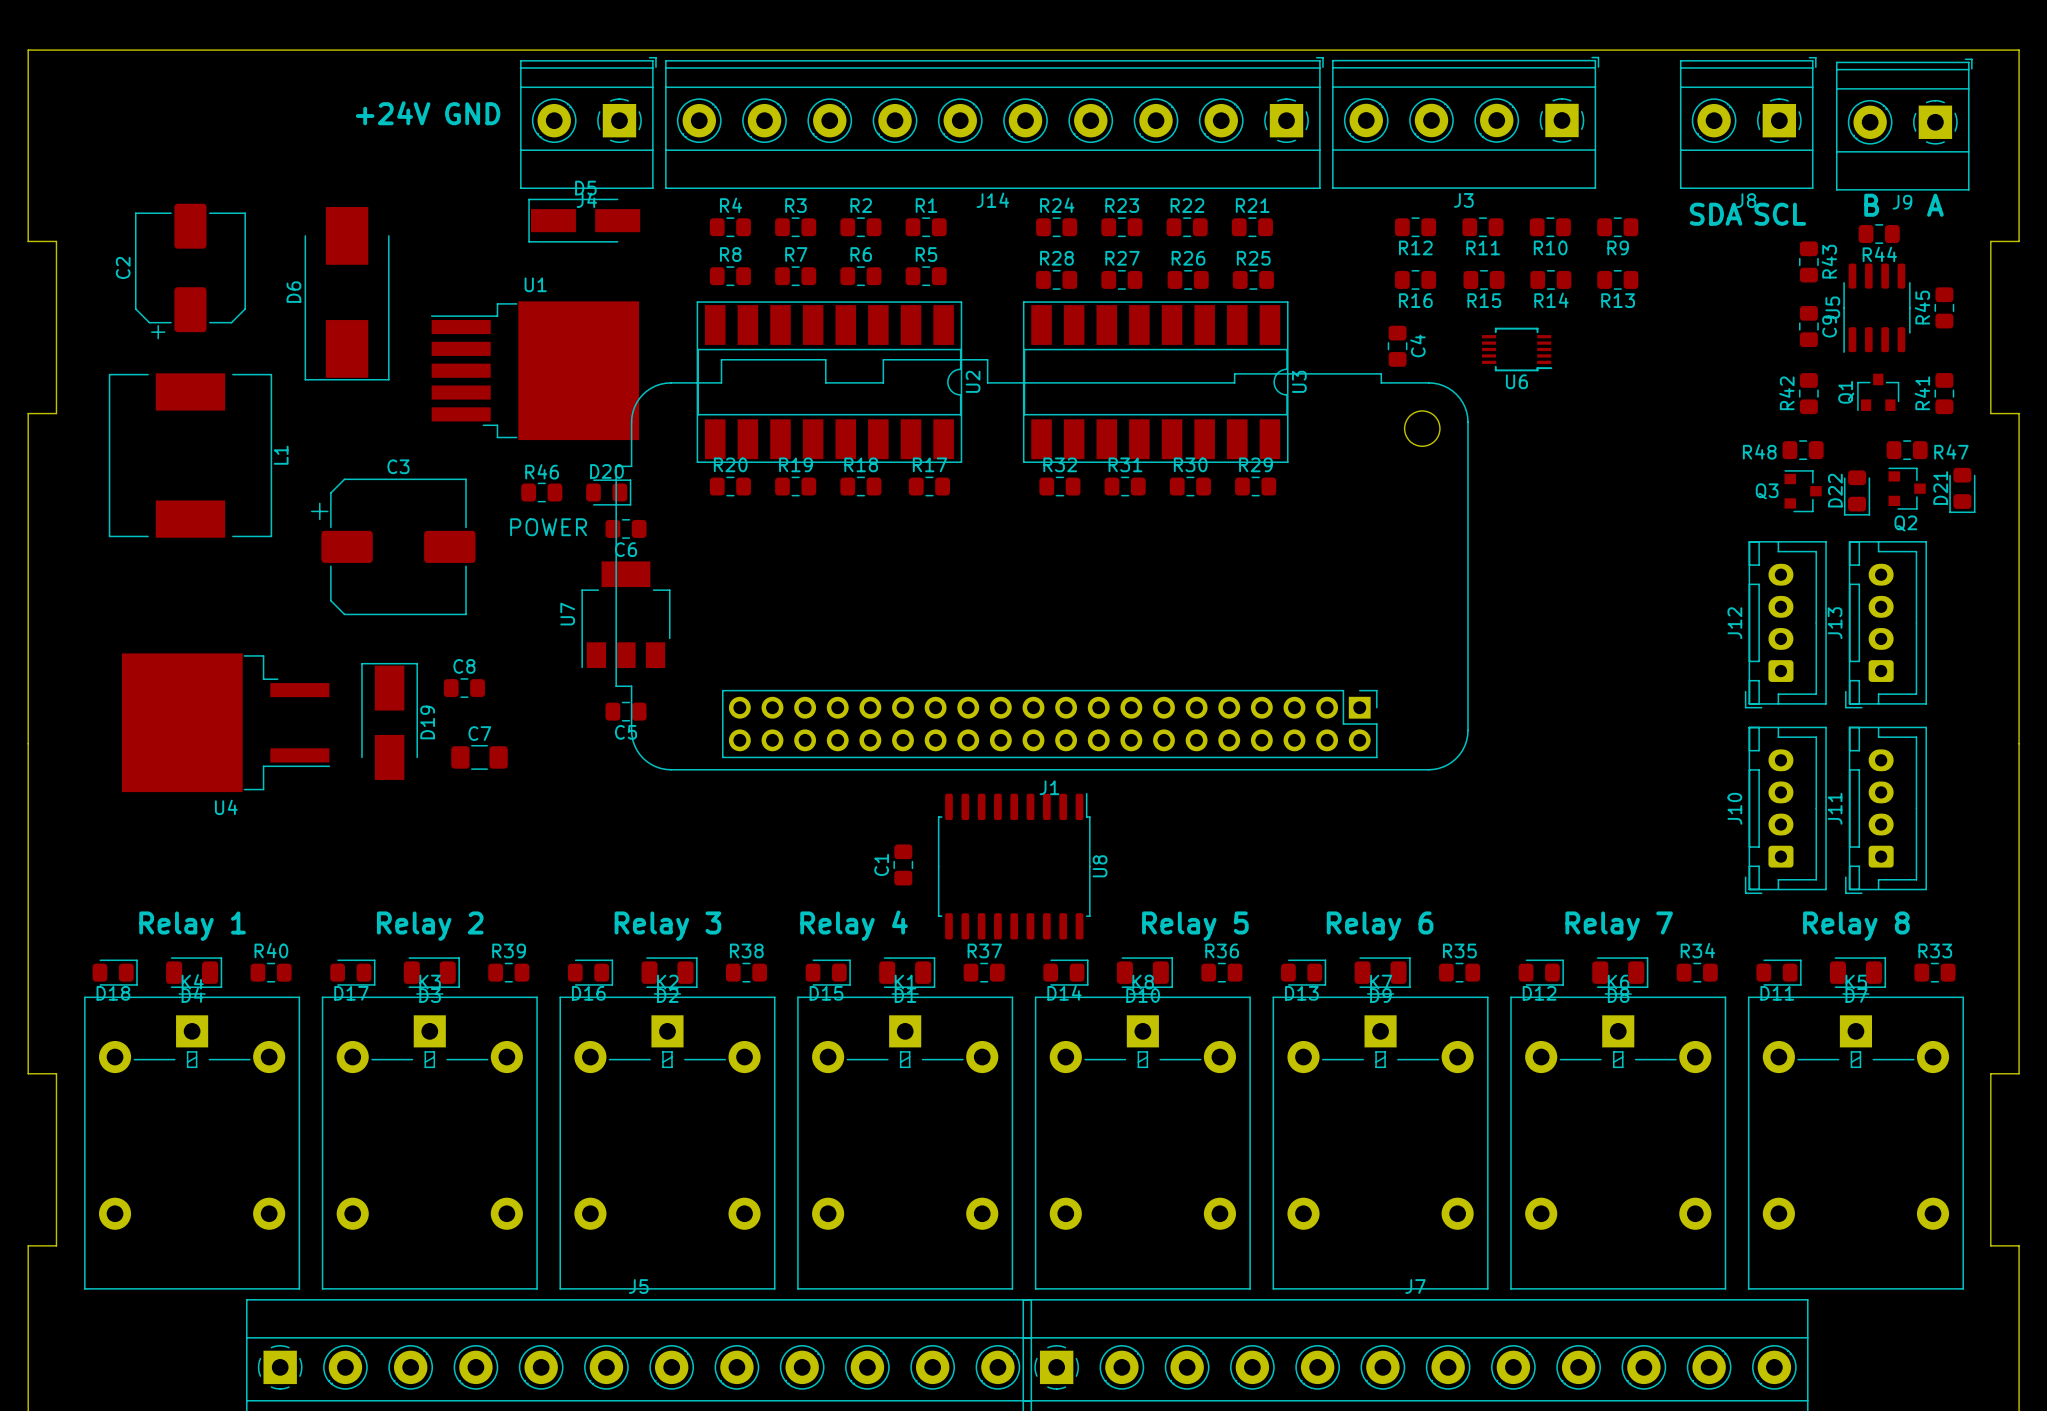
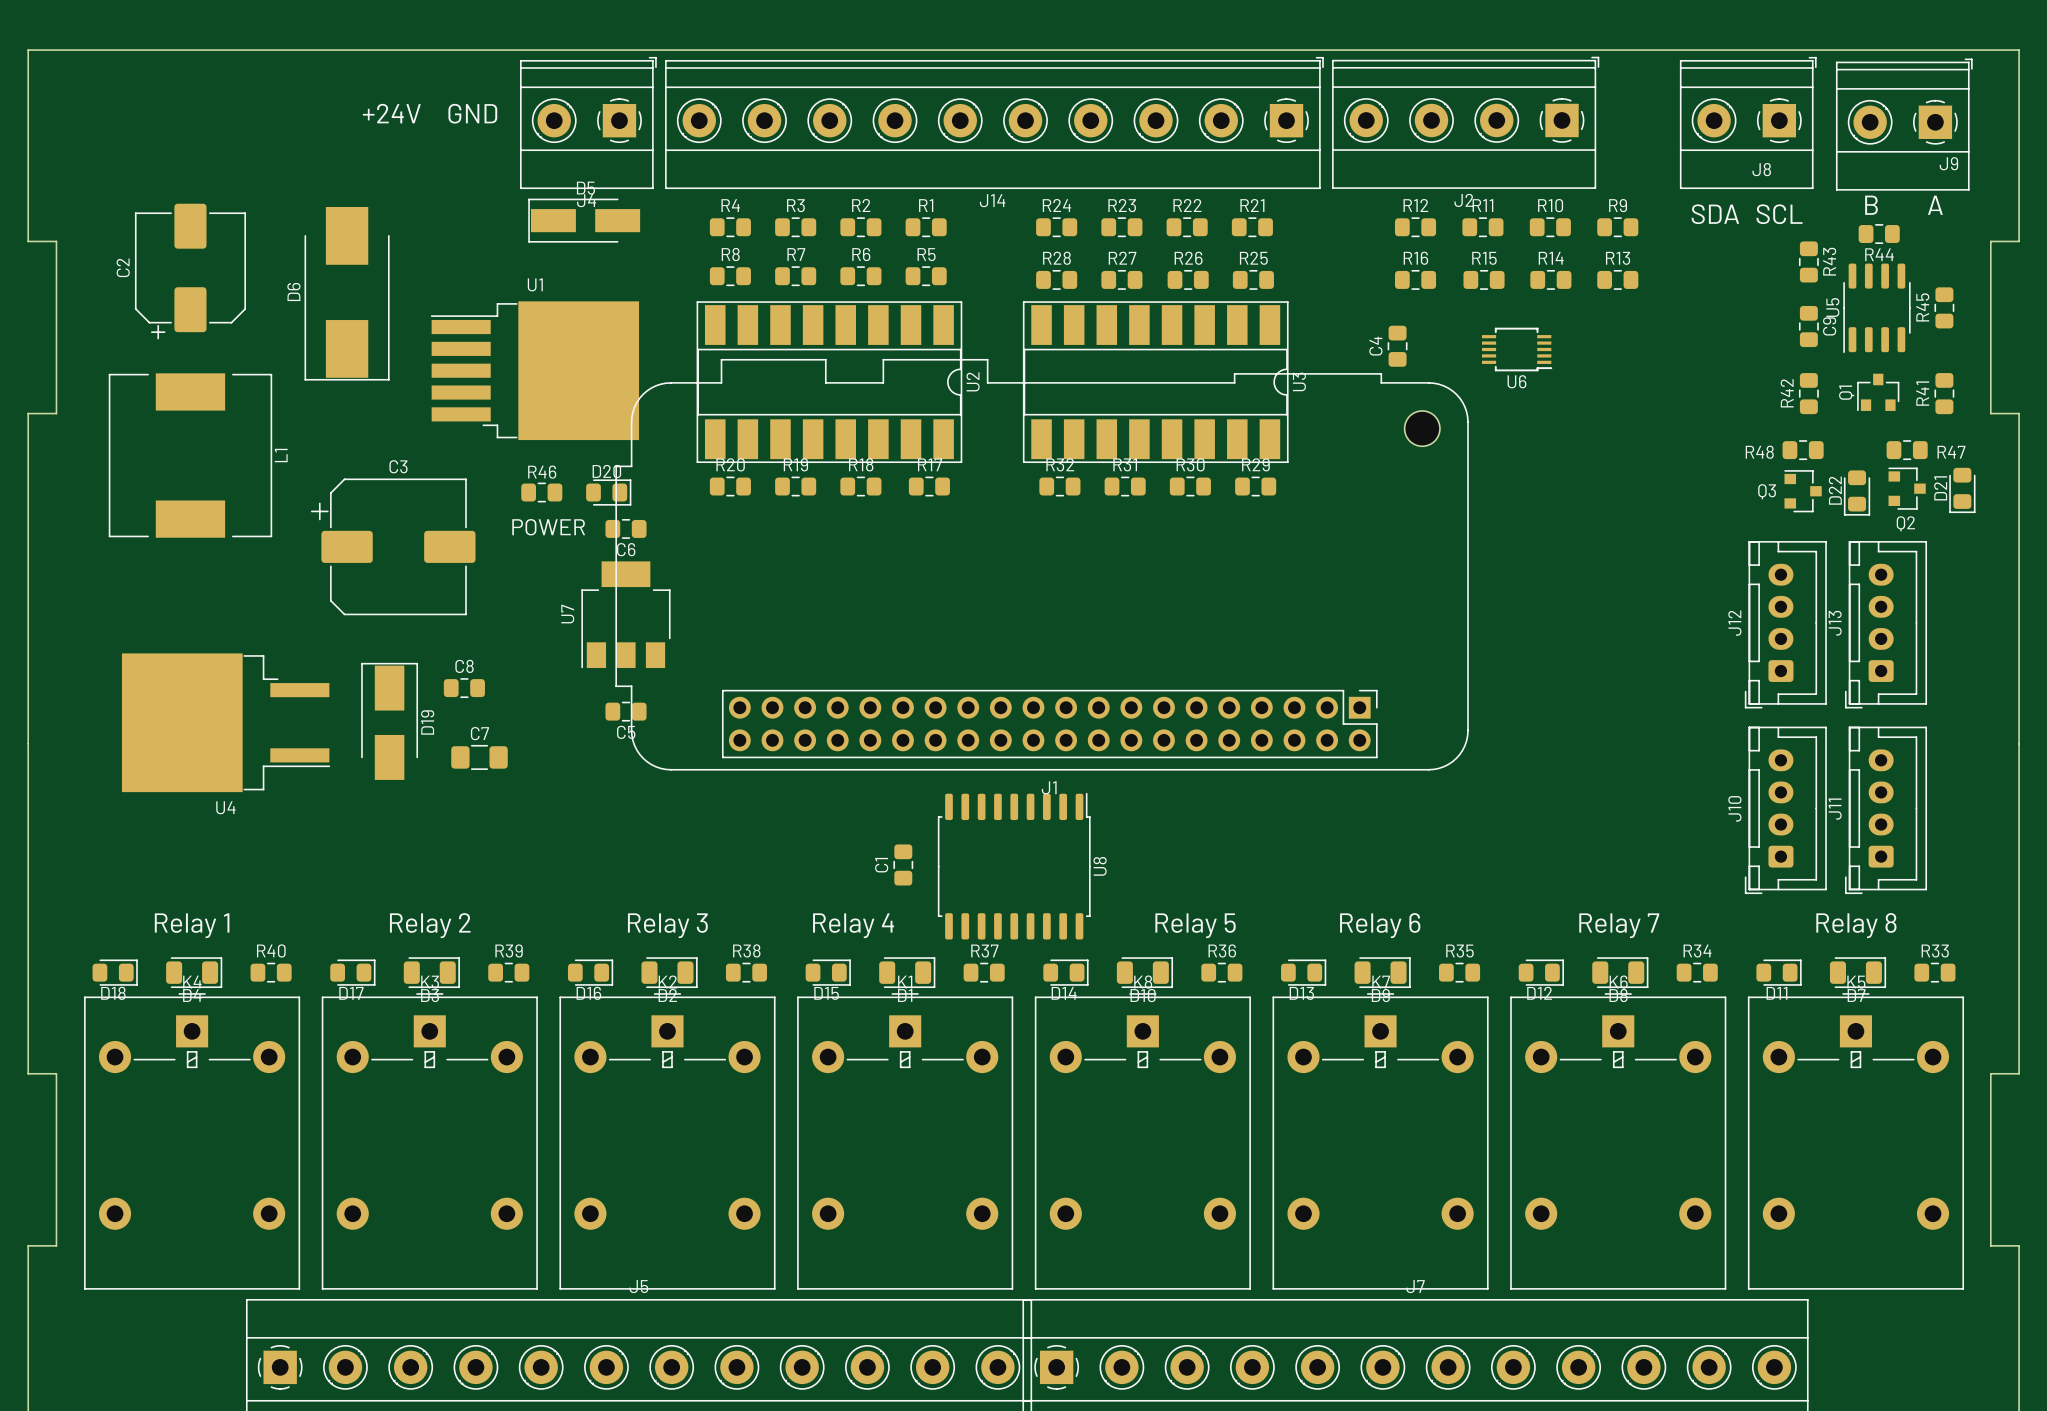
J3 name: J3 (1463, 200) -> J2 (1463, 200)
J8 name position: J8 (1746, 200) -> J8 (1761, 169)
J9 name position: J9 (1902, 202) -> J9 (1948, 163)
R12 name position: R12 (1415, 247) -> R12 (1415, 205)
R11 name position: R11 (1483, 247) -> R11 (1482, 205)
R10 name position: R10 (1550, 247) -> R10 (1550, 205)
R9 name position: R9 (1618, 247) -> R9 (1618, 205)
R16 name position: R16 (1415, 300) -> R16 (1415, 258)
R15 name position: R15 (1484, 300) -> R15 (1484, 258)
R14 name position: R14 (1551, 300) -> R14 (1551, 258)
R13 name position: R13 (1618, 300) -> R13 (1618, 258)
C4 name position: C4 (1417, 345) -> C4 (1375, 346)

